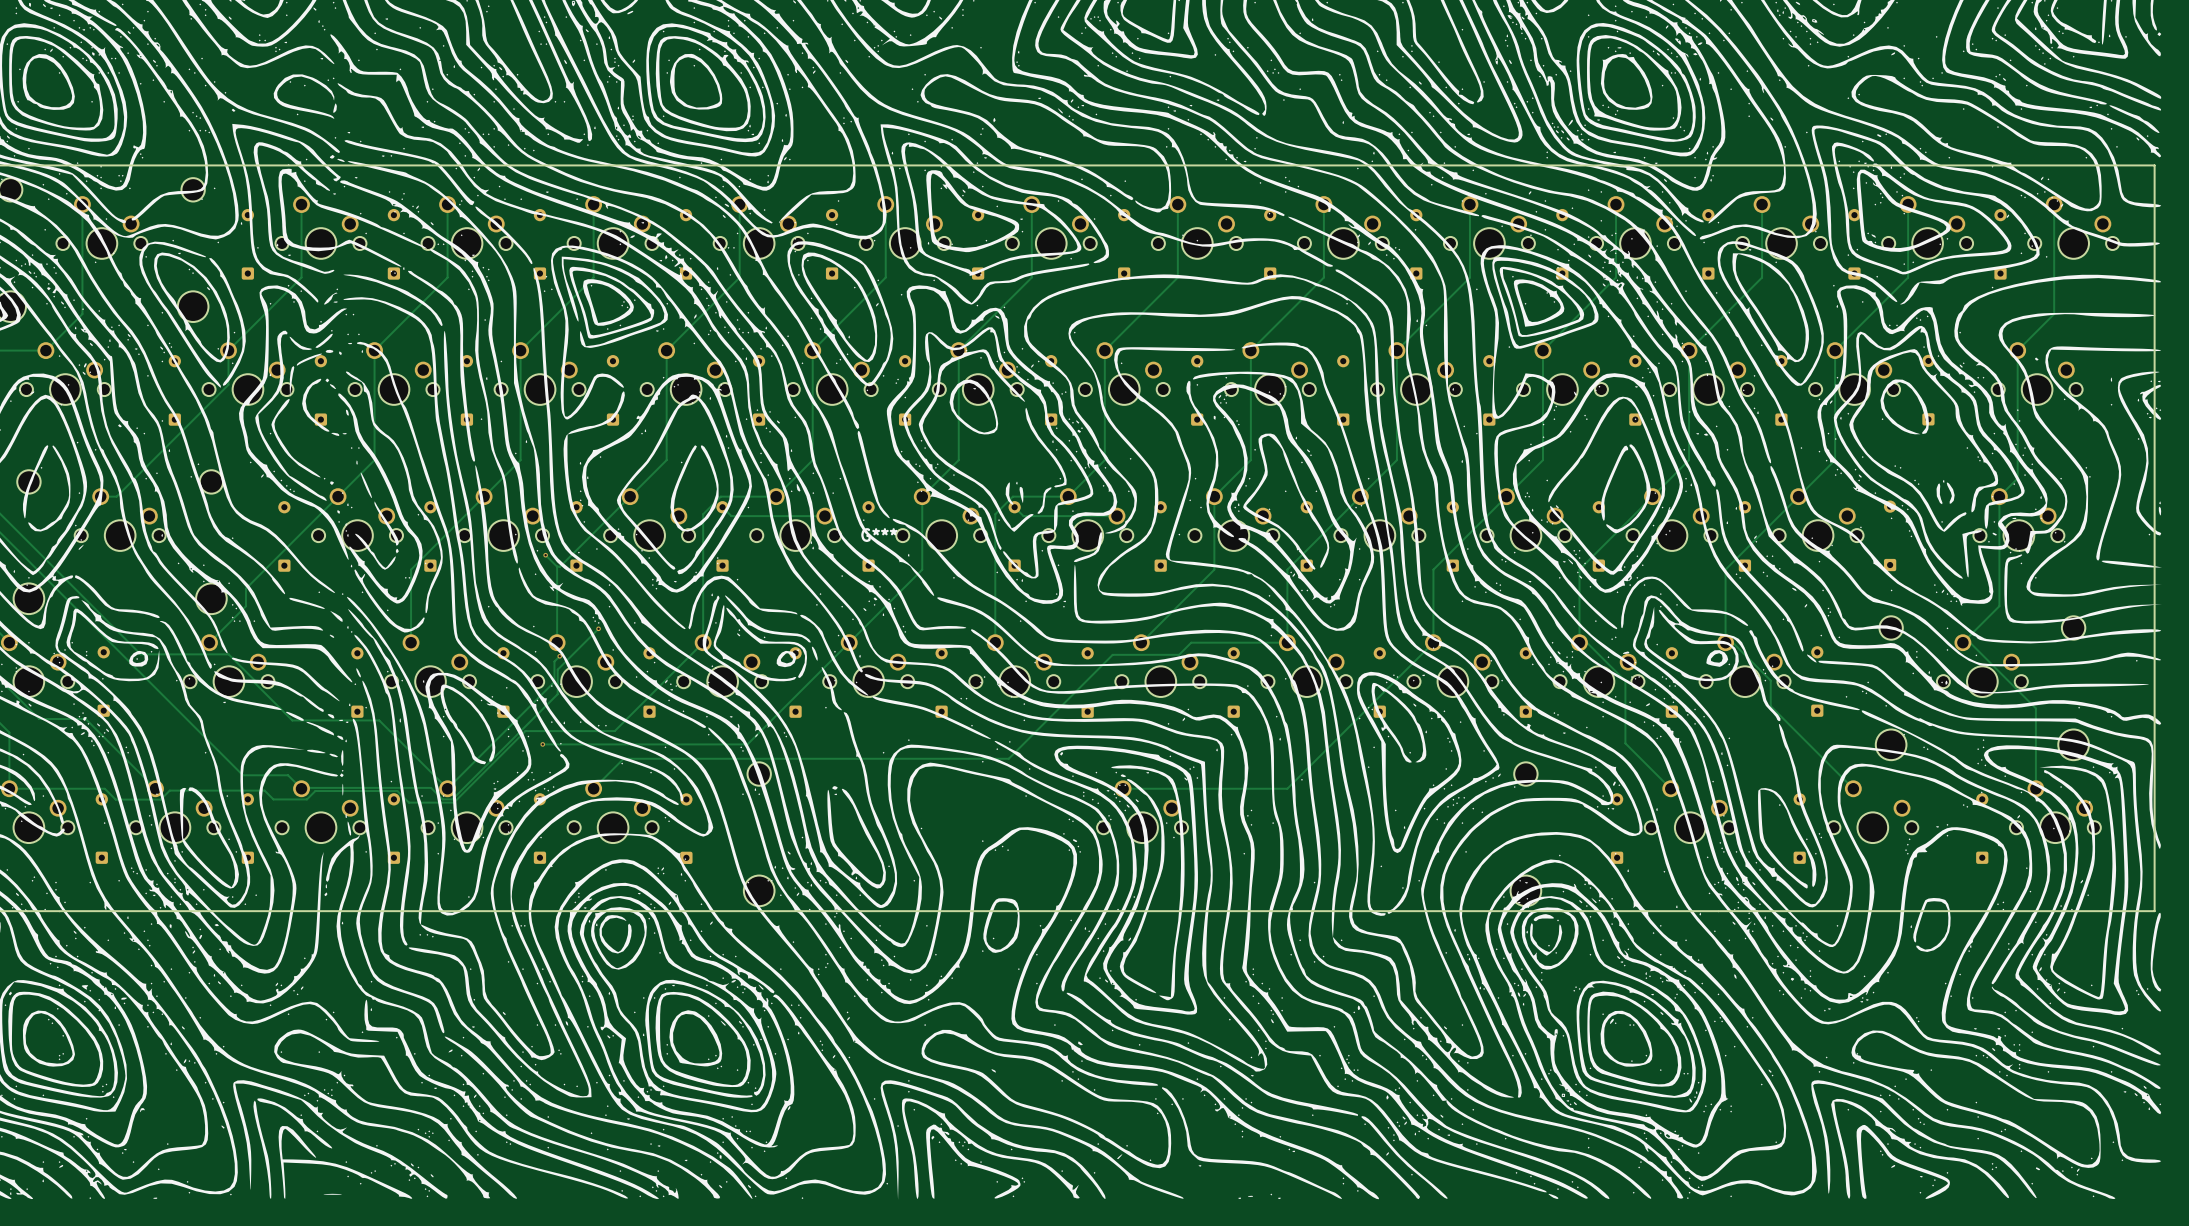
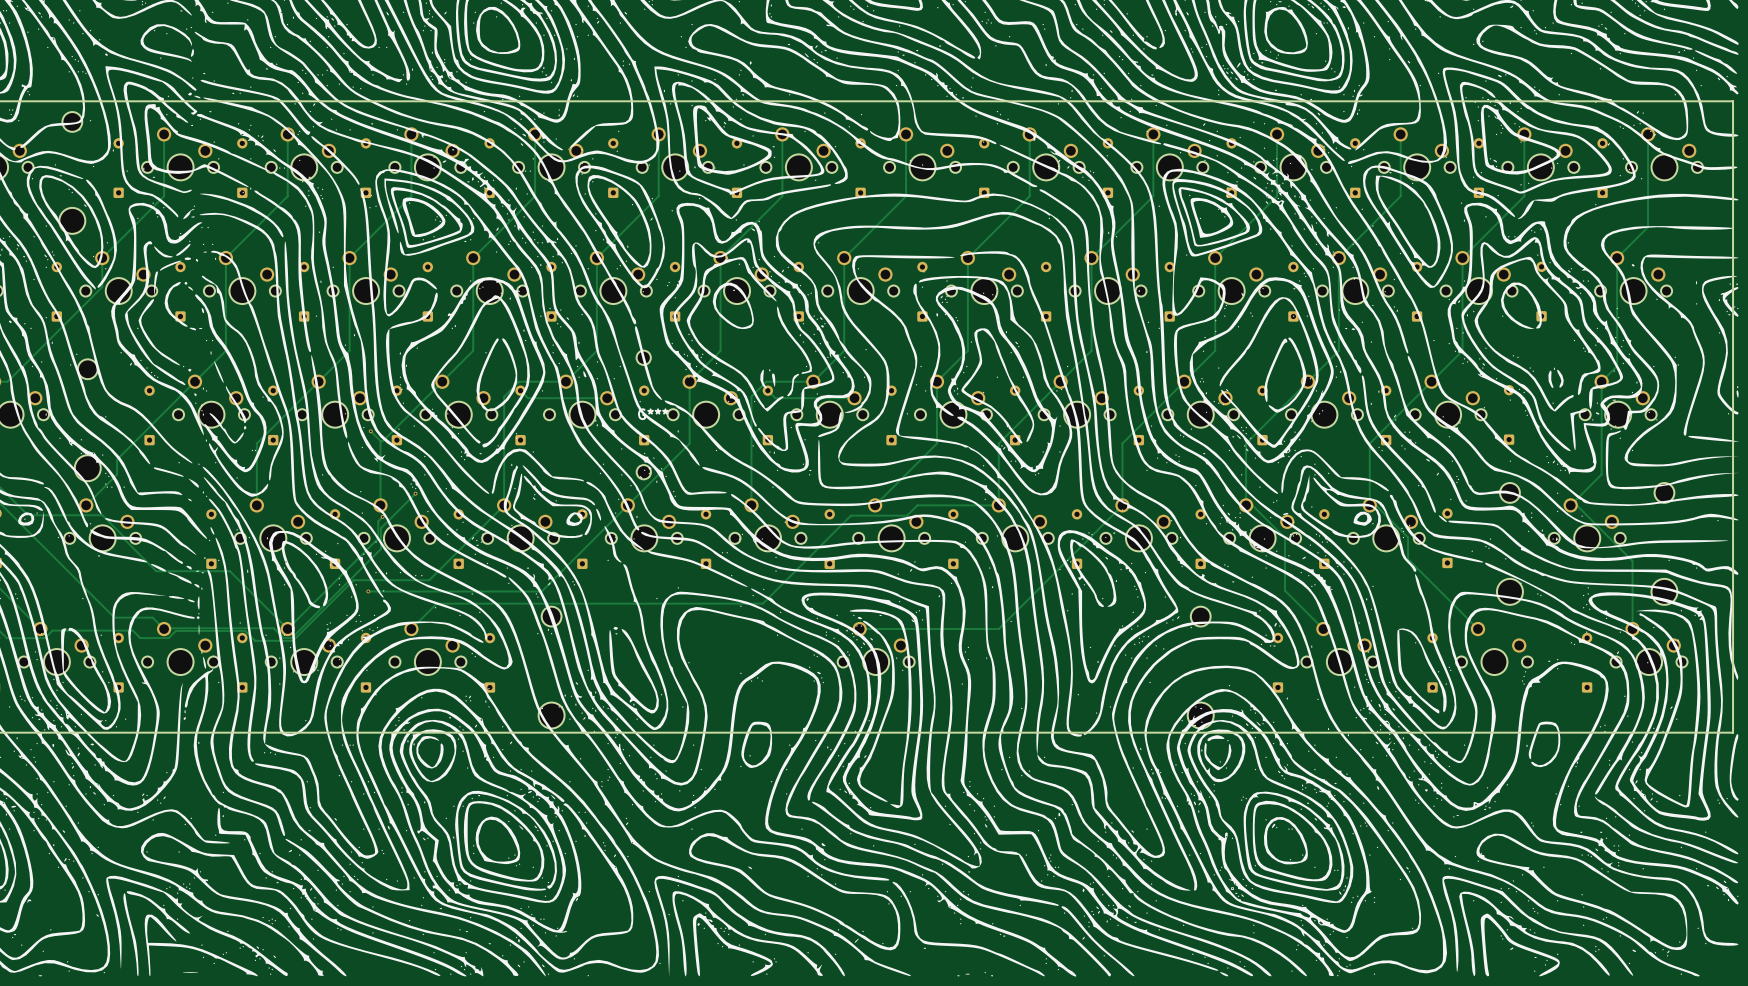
part: none -> (643, 357)
part: none -> (643, 472)

